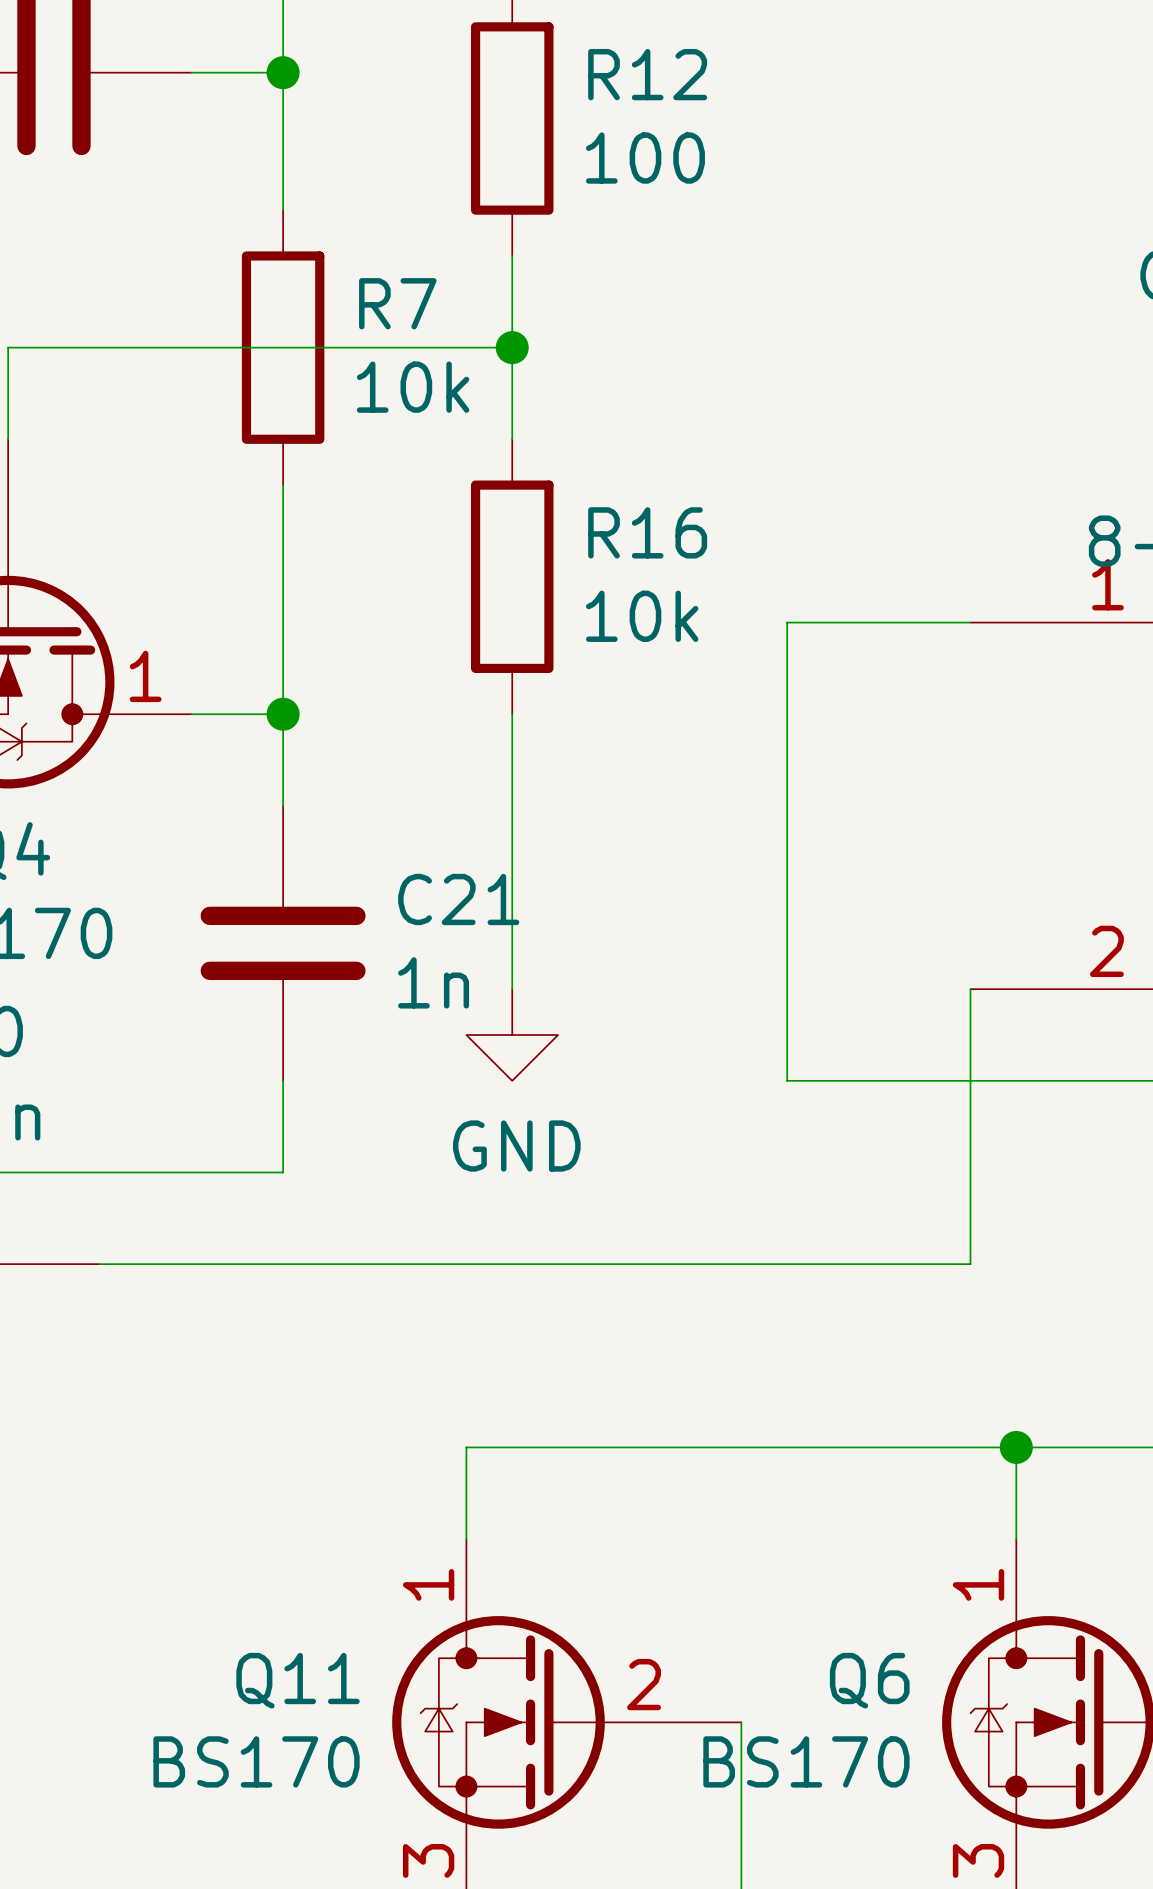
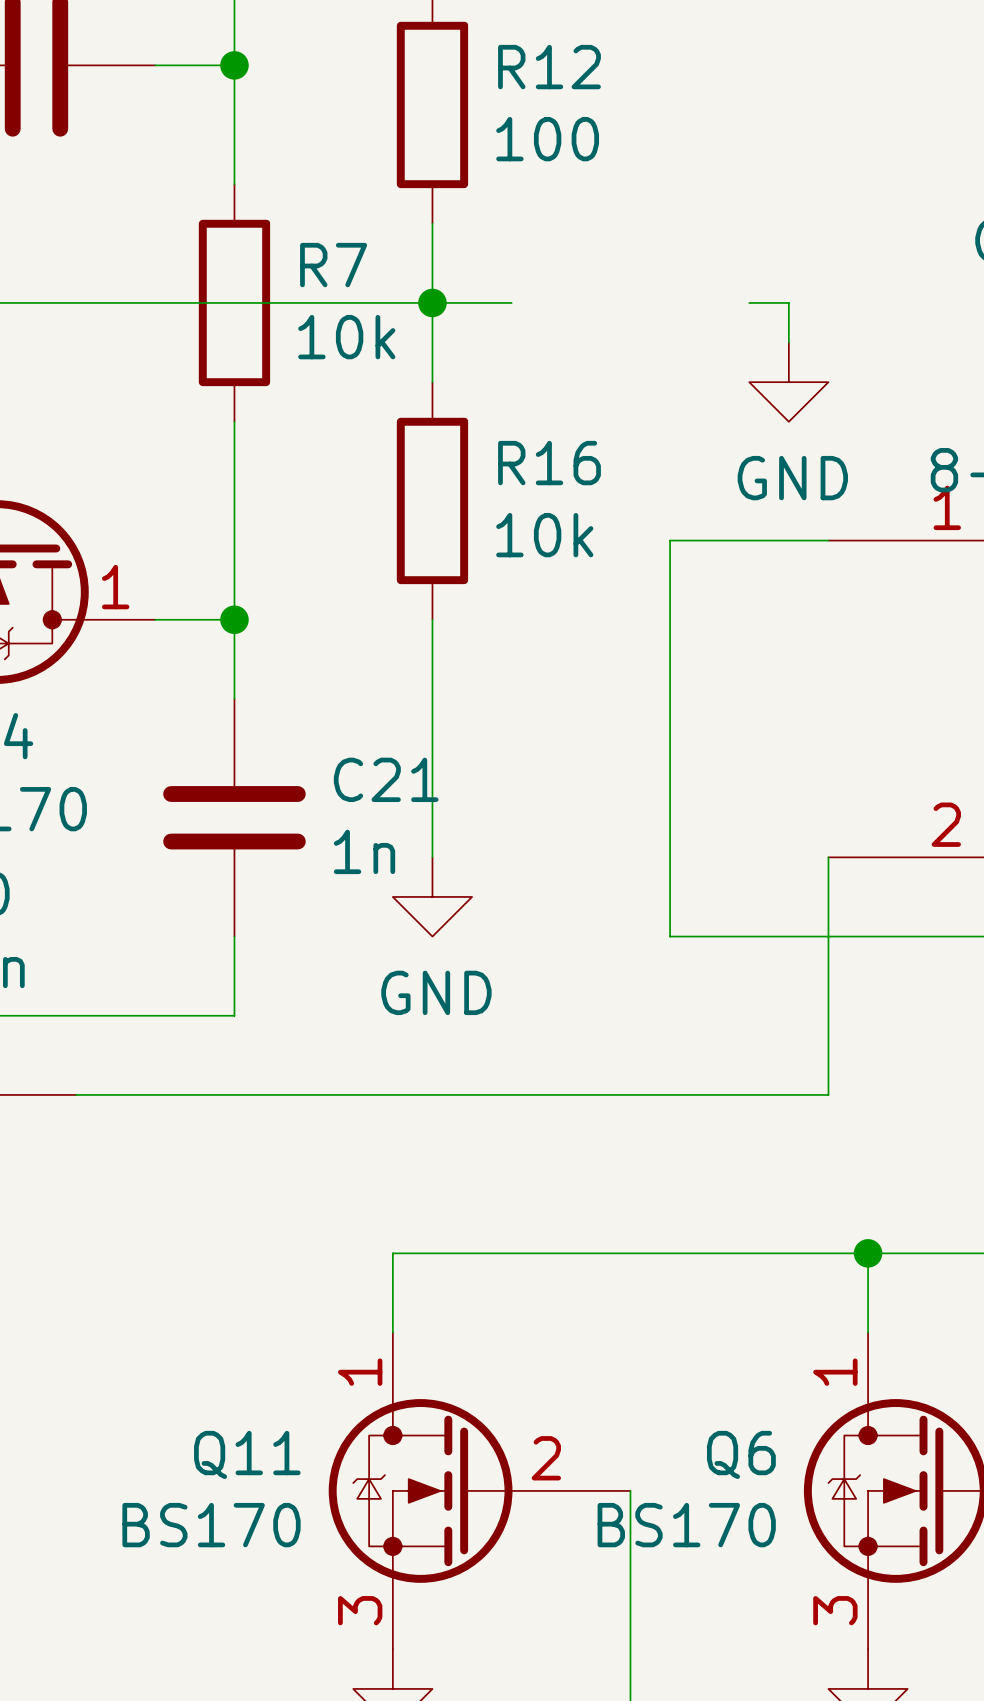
wire: none -> (432, 302) (511, 302)
wire: none -> (749, 302) (788, 302) (788, 342)
power symbol: none -> GND (788, 382)

